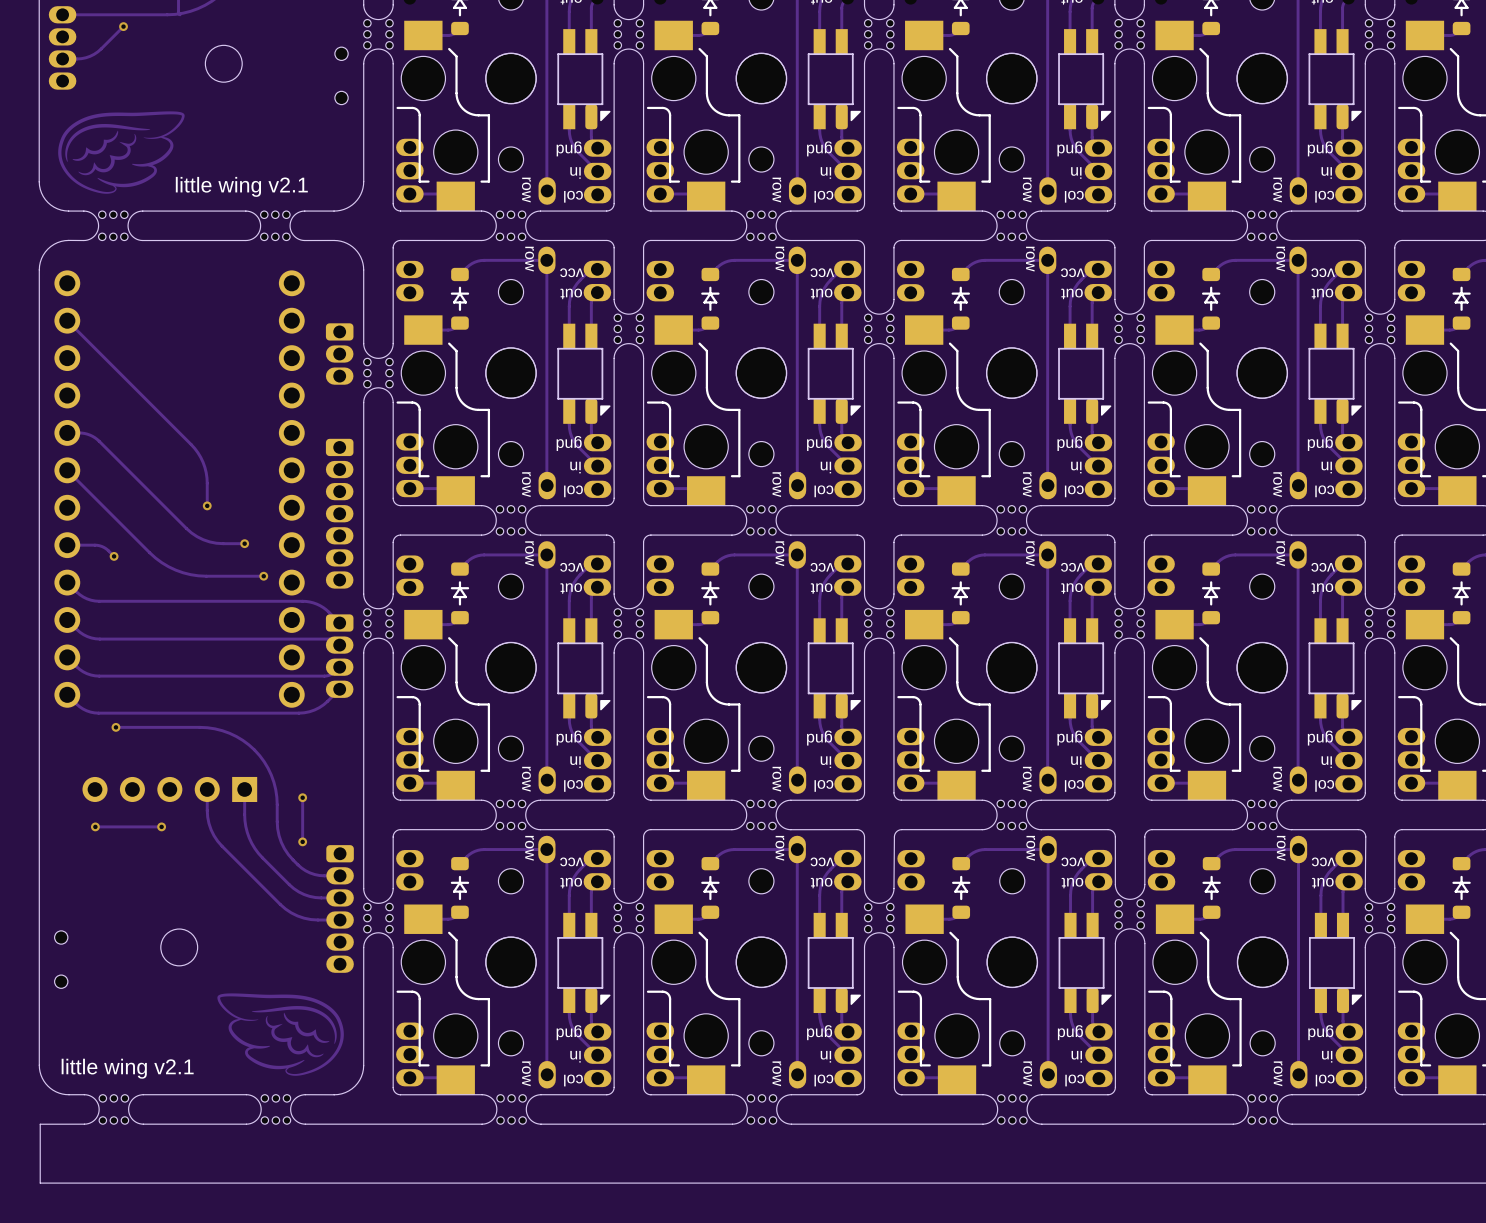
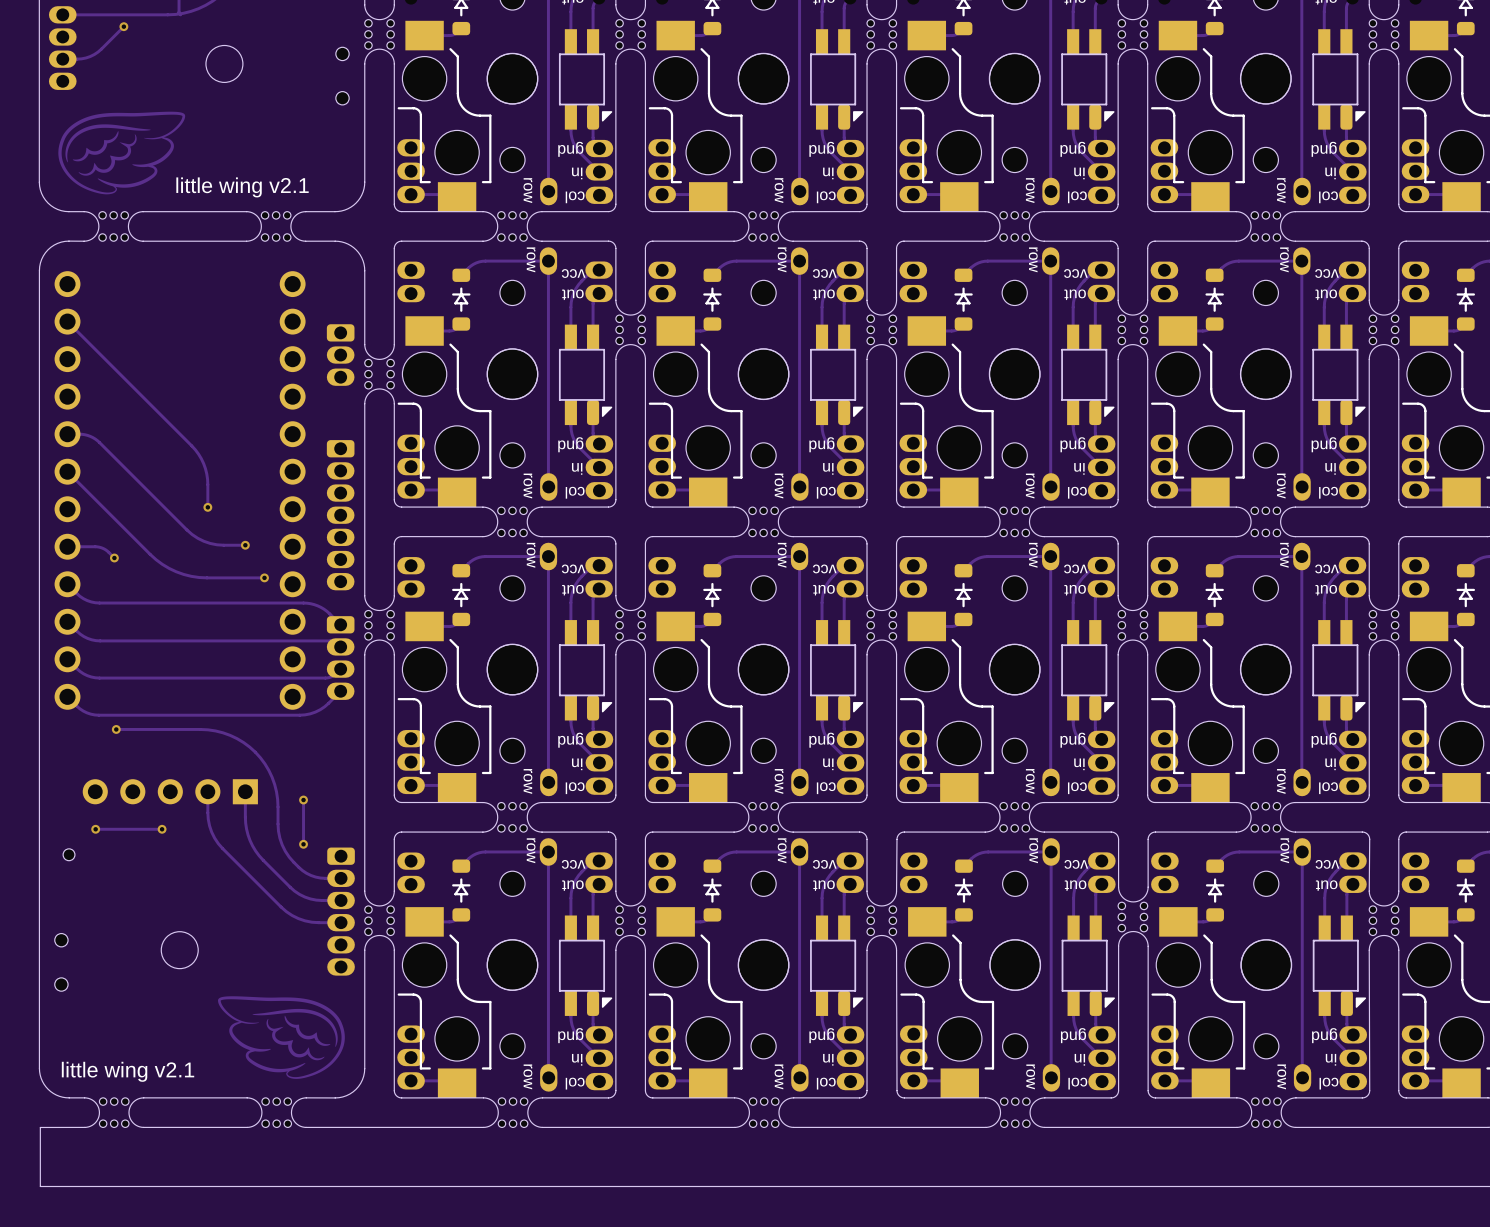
part: none -> (69, 854)

